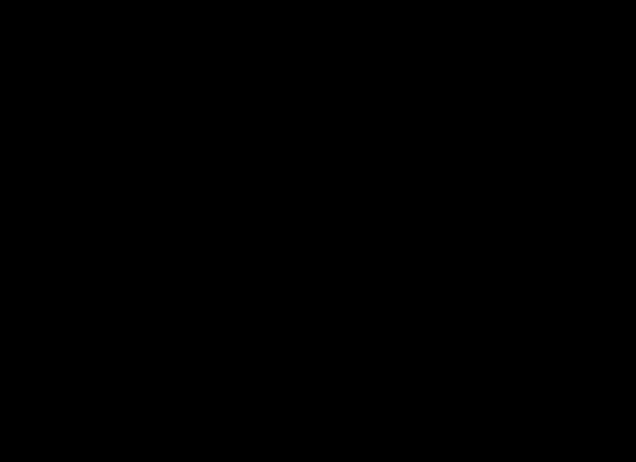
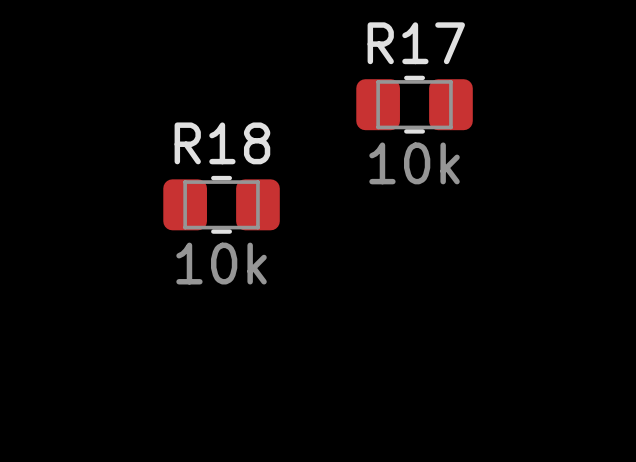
R17: none -> 10k (414, 104)
R18: none -> 10k (221, 204)

